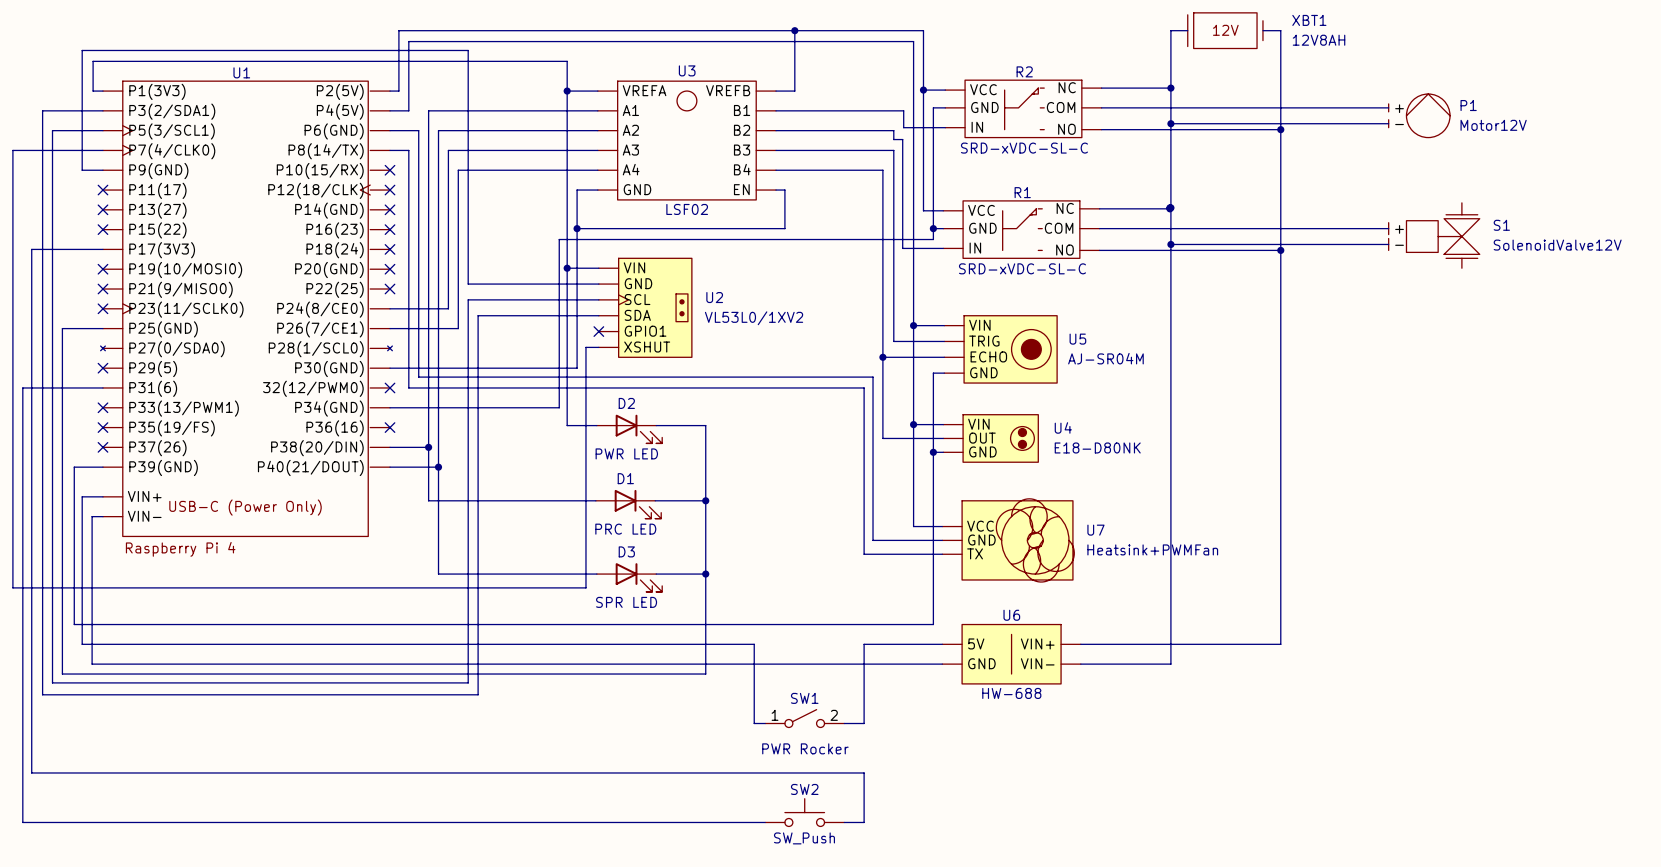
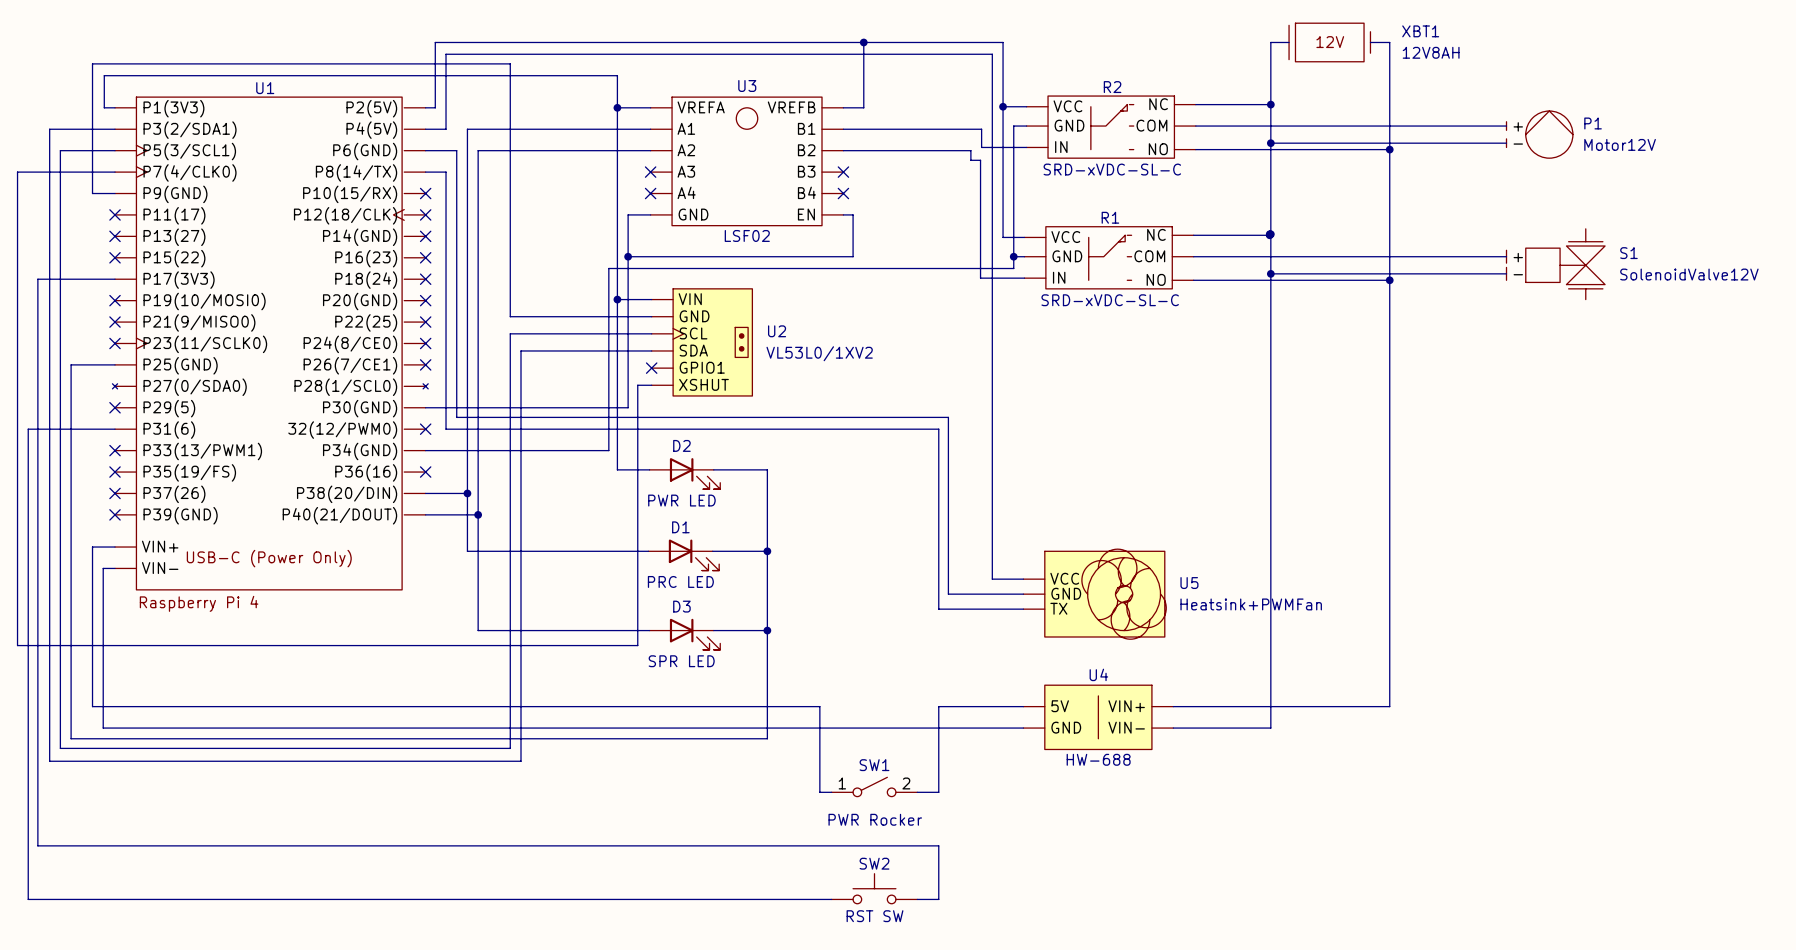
wire: (597, 150) (448, 150) (448, 308) (390, 308) -> none
no-connect mark: none -> (650, 172)
wire: (776, 150) (893, 150) (893, 341) (944, 341) -> none
no-connect mark: none -> (843, 172)
wire: (597, 170) (458, 170) (458, 328) (390, 328) -> none
no-connect mark: none -> (650, 193)
wire: (776, 170) (882, 170) (882, 438) (943, 438) -> none
no-connect mark: none -> (843, 193)
no-connect mark: none -> (425, 343)
wire: (913, 325) (944, 325) -> none
junction: (913, 325) -> none
no-connect mark: none -> (425, 364)
U5: AJ-SR04M (1000, 349) -> none
wire: (882, 357) (944, 357) -> none
junction: (882, 357) -> none
wire: (944, 373) (933, 373) (933, 624) (74, 624) (74, 467) (102, 467) -> none
wire: (913, 424) (943, 424) -> none
junction: (913, 424) -> none
U4: E18-D80NK (990, 438) -> none
wire: (933, 452) (943, 452) -> none
junction: (933, 452) -> none
no-connect mark: none -> (115, 514)
U7 name: U7 (1095, 530) -> U5 (1189, 583)
U6 name: U6 (1011, 615) -> U4 (1098, 674)
SW2 value: SW_Push (804, 838) -> RST SW (875, 916)

